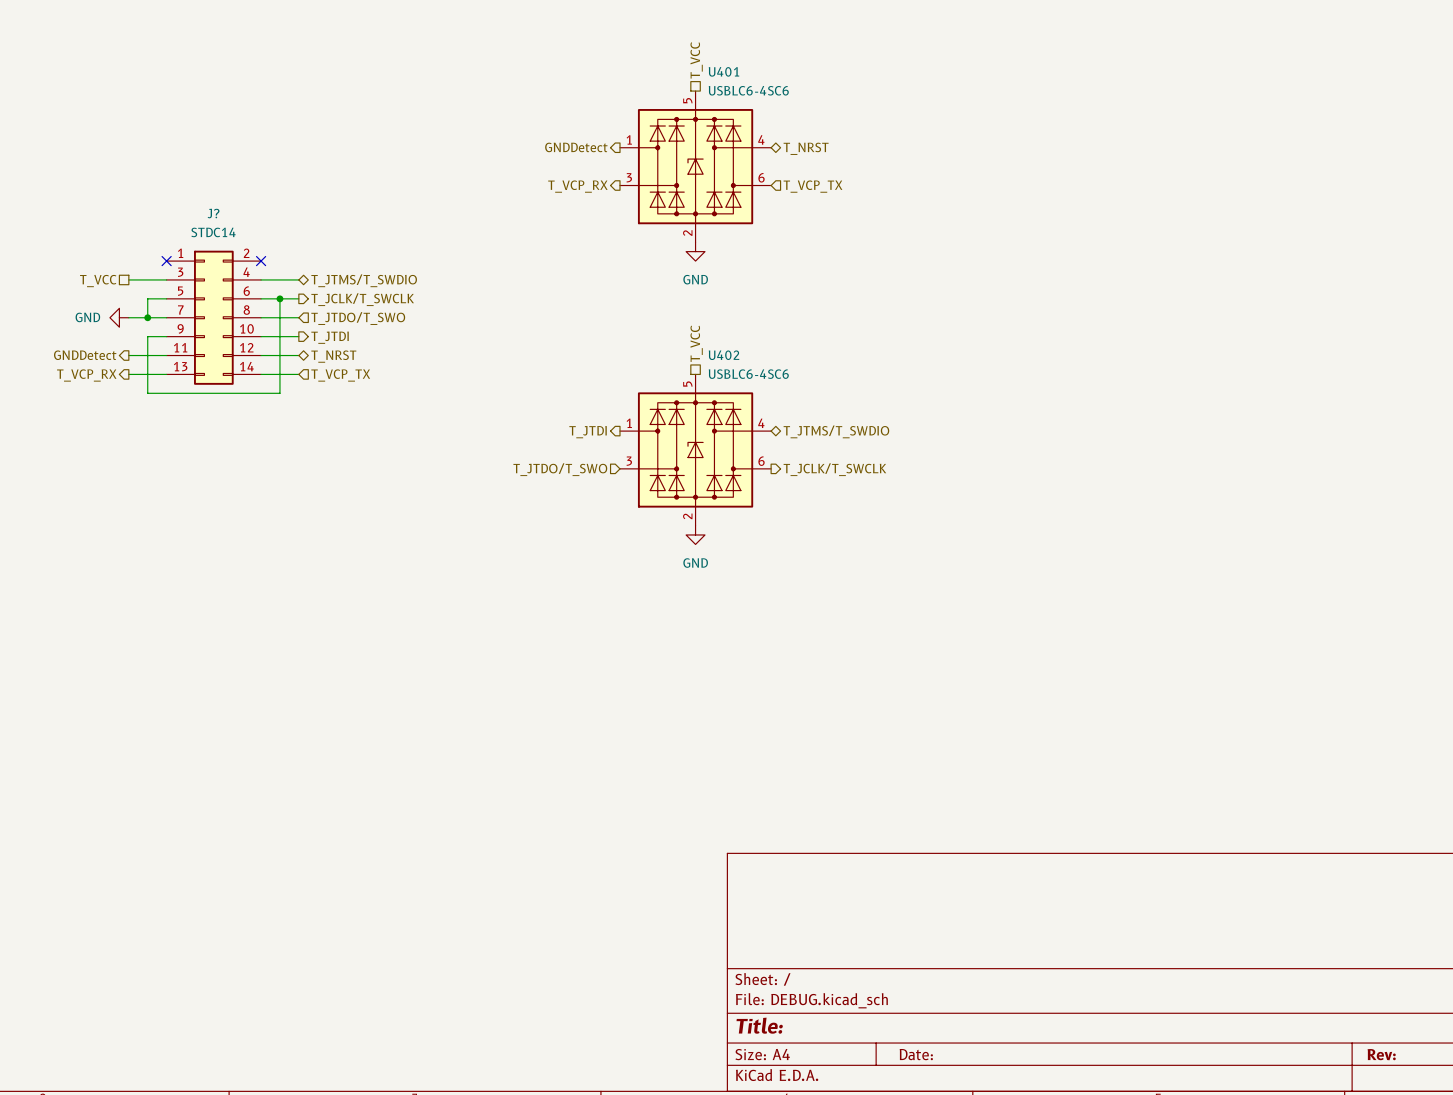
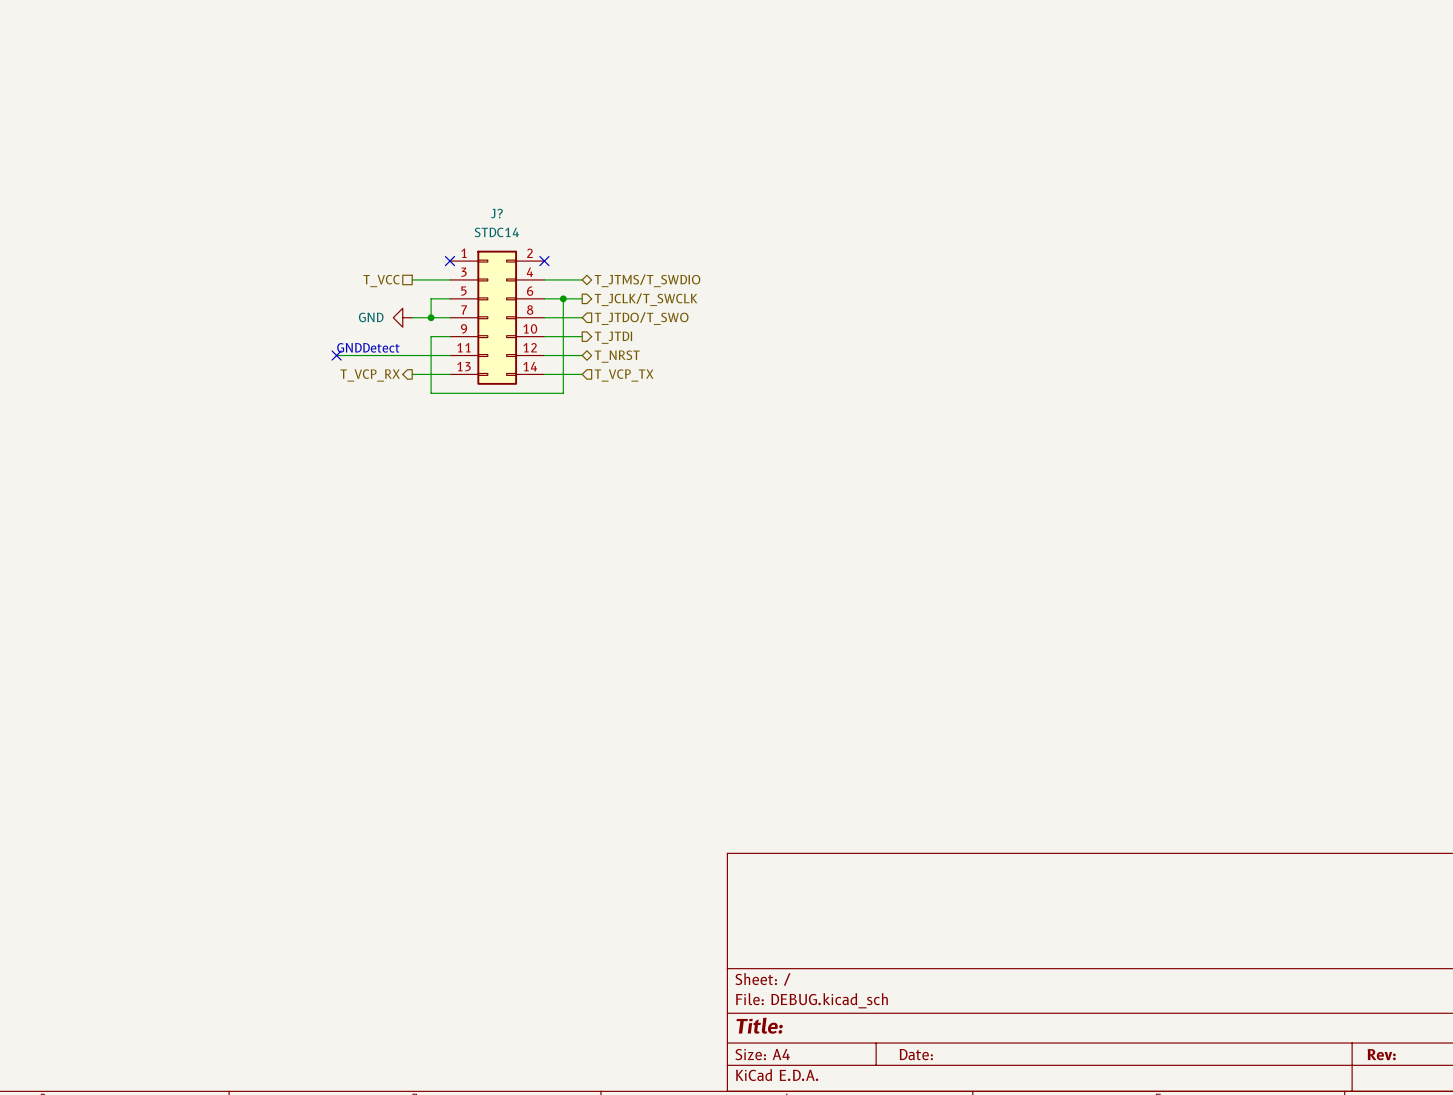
hierarchical label: T_VCC (696, 60) -> none
hierarchical label: GNDDetect (576, 147) -> none
hierarchical label: T_NRST (806, 148) -> none
U401: USBLC6-4SC6 (695, 166) -> none
hierarchical label: T_VCP_RX (577, 186) -> none
hierarchical label: T_VCP_TX (812, 186) -> none
power symbol: GND (695, 251) -> none
no-connect mark: (166, 261) -> none
no-connect mark: (261, 261) -> none
no-connect mark: none -> (449, 261)
no-connect mark: none -> (544, 261)
wire: (128, 279) (166, 279) -> none
wire: (261, 279) (298, 279) -> (412, 279) (449, 279)
wire: none -> (544, 279) (582, 279)
hierarchical label: T_JTMS/T_SWDIO (364, 280) -> none
hierarchical label: none -> T_JTMS/T_SWDIO (647, 280)
hierarchical label: T_VCC (98, 281) -> none
hierarchical label: none -> T_VCC (381, 281)
wire: (166, 298) (147, 298) (147, 317) -> none
wire: (261, 298) (298, 298) -> none
wire: (279, 298) (279, 393) (147, 393) (147, 336) (166, 336) -> none
junction: (279, 298) -> none
wire: none -> (449, 298) (431, 298) (431, 317)
wire: none -> (544, 298) (582, 298)
wire: none -> (563, 298) (563, 393) (431, 393) (431, 336) (449, 336)
junction: none -> (563, 298)
hierarchical label: T_JCLK/T_SWCLK (362, 299) -> none
hierarchical label: none -> T_JCLK/T_SWCLK (646, 299)
power symbol: GND (119, 317) -> none
wire: (128, 317) (166, 317) -> none
junction: (147, 317) -> none
J?: STDC14 (213, 317) -> none
wire: (261, 317) (298, 317) -> (412, 317) (449, 317)
power symbol: none -> GND (402, 317)
junction: none -> (431, 317)
J?: none -> STDC14 (497, 317)
wire: none -> (544, 317) (582, 317)
hierarchical label: T_JTDO/T_SWO (358, 318) -> none
hierarchical label: none -> T_JTDO/T_SWO (641, 318)
wire: (261, 336) (298, 336) -> none
wire: none -> (544, 336) (582, 336)
hierarchical label: T_JTDI (330, 337) -> none
hierarchical label: T_VCC (696, 343) -> none
text: none -> GNDDetect (368, 347)
hierarchical label: GNDDetect (85, 355) -> none
wire: (128, 355) (166, 355) -> none
wire: (261, 355) (298, 355) -> none
wire: none -> (336, 355) (449, 355)
no-connect mark: none -> (336, 355)
wire: none -> (544, 355) (582, 355)
hierarchical label: T_NRST (333, 356) -> none
hierarchical label: none -> T_NRST (617, 356)
wire: (128, 374) (166, 374) -> none
wire: (261, 374) (298, 374) -> (412, 374) (449, 374)
wire: none -> (544, 374) (582, 374)
hierarchical label: T_VCP_RX (86, 375) -> none
hierarchical label shape: input (340, 375) -> output (370, 375)
hierarchical label: T_VCP_TX (340, 375) -> T_VCP_RX (370, 375)
hierarchical label: none -> T_VCP_TX (624, 375)
hierarchical label: T_JTMS/T_SWDIO (836, 431) -> none
hierarchical label rotation: 0° (588, 432) -> 180° (613, 337)
hierarchical label position: T_JTDI (588, 432) -> T_JTDI (613, 337)
U402: USBLC6-4SC6 (695, 449) -> none
hierarchical label: T_JTDO/T_SWO (560, 469) -> none
hierarchical label: T_JCLK/T_SWCLK (834, 469) -> none
power symbol: GND (695, 534) -> none

